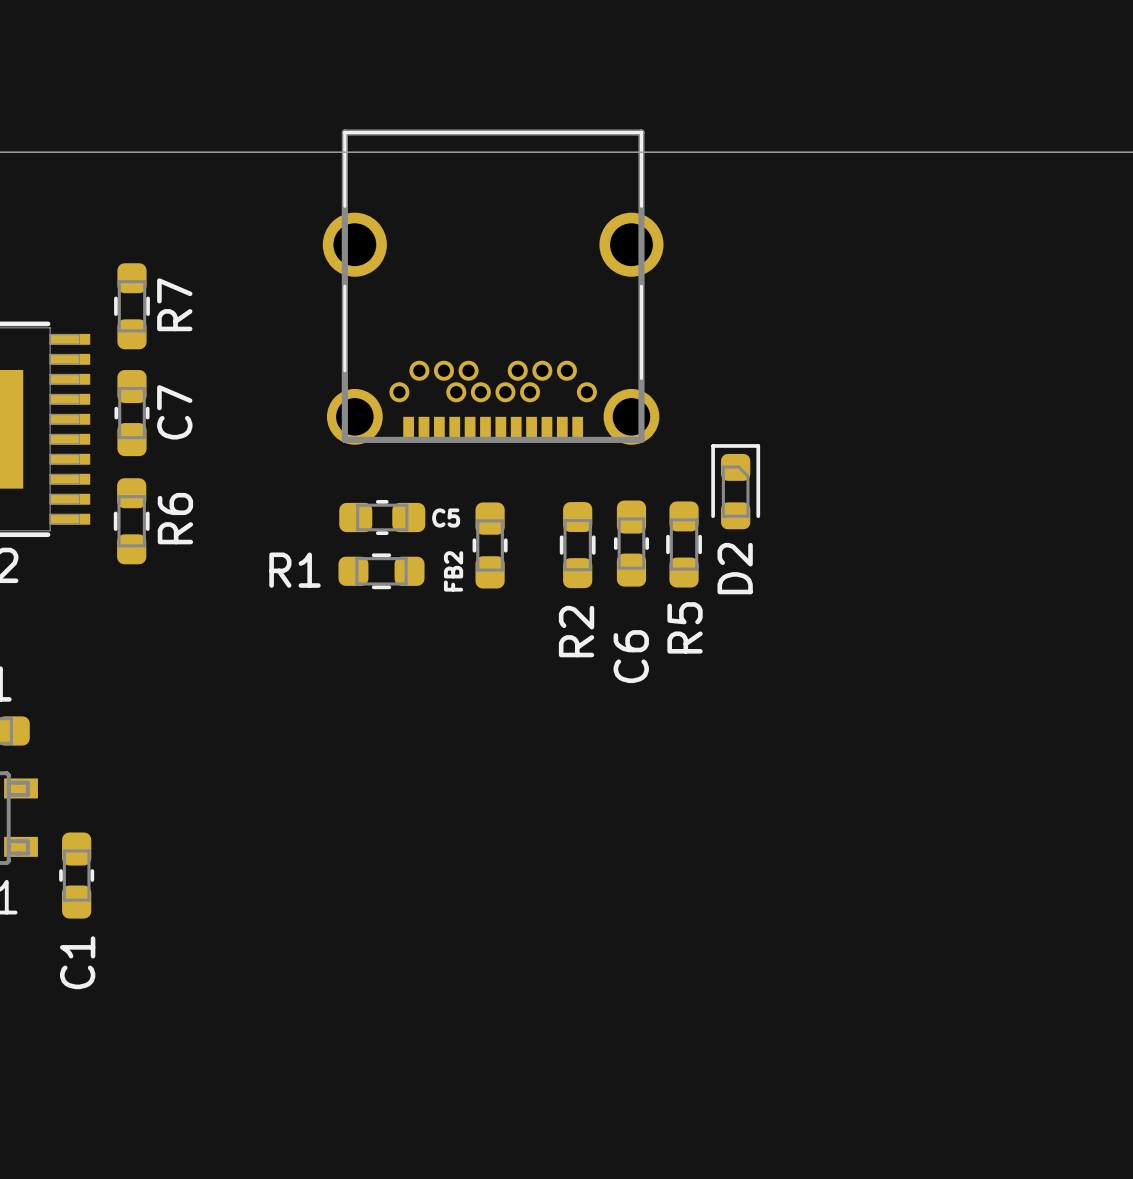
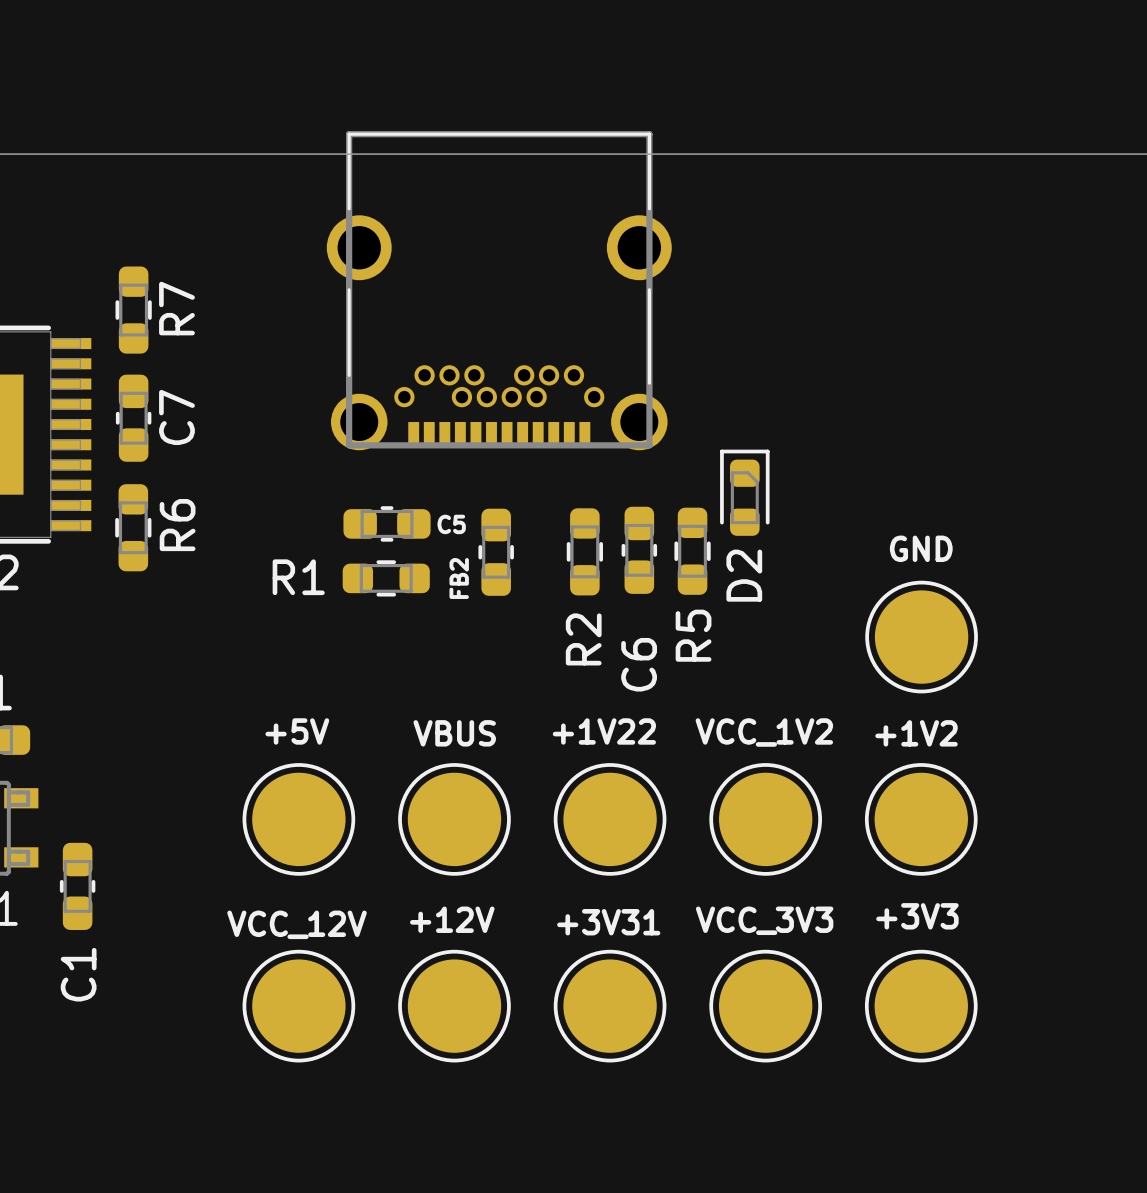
GND: none -> (921, 637)
+5V: none -> (298, 819)
VBUS: none -> (454, 819)
+1V22: none -> (610, 819)
VCC_1V2: none -> (765, 819)
+1V2: none -> (921, 819)
VCC_12V: none -> (298, 1006)
+12V: none -> (454, 1006)
+3V31: none -> (610, 1006)
VCC_3V3: none -> (765, 1006)
+3V3: none -> (921, 1006)

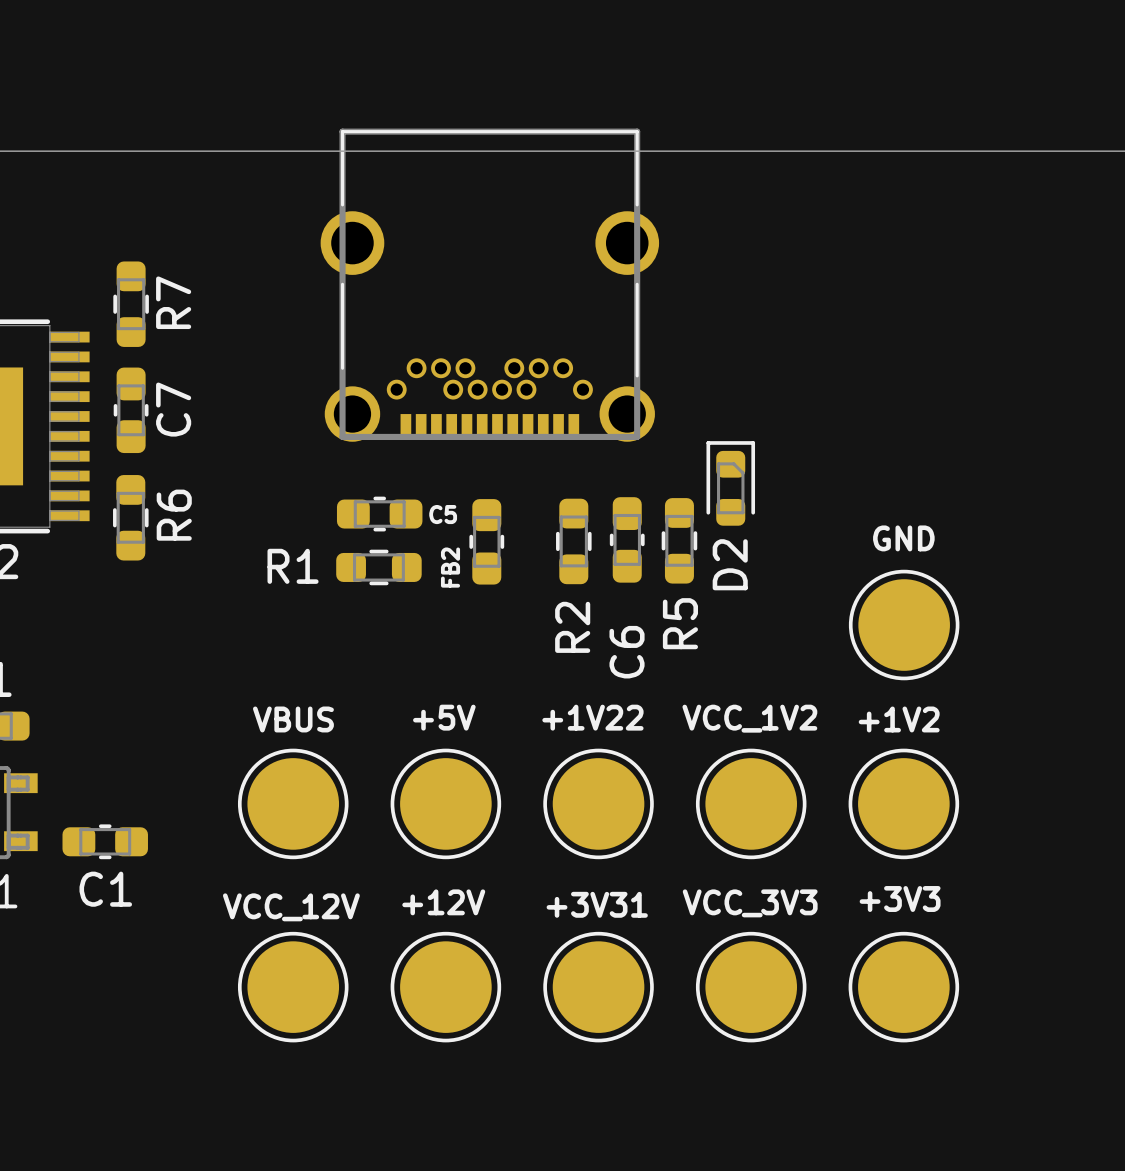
+5V name: +5V (297, 731) -> VBUS (293, 719)
VBUS name: VBUS (454, 733) -> +5V (444, 717)
C1 rotation: 0° (77, 886) -> 90° clockwise (105, 841)

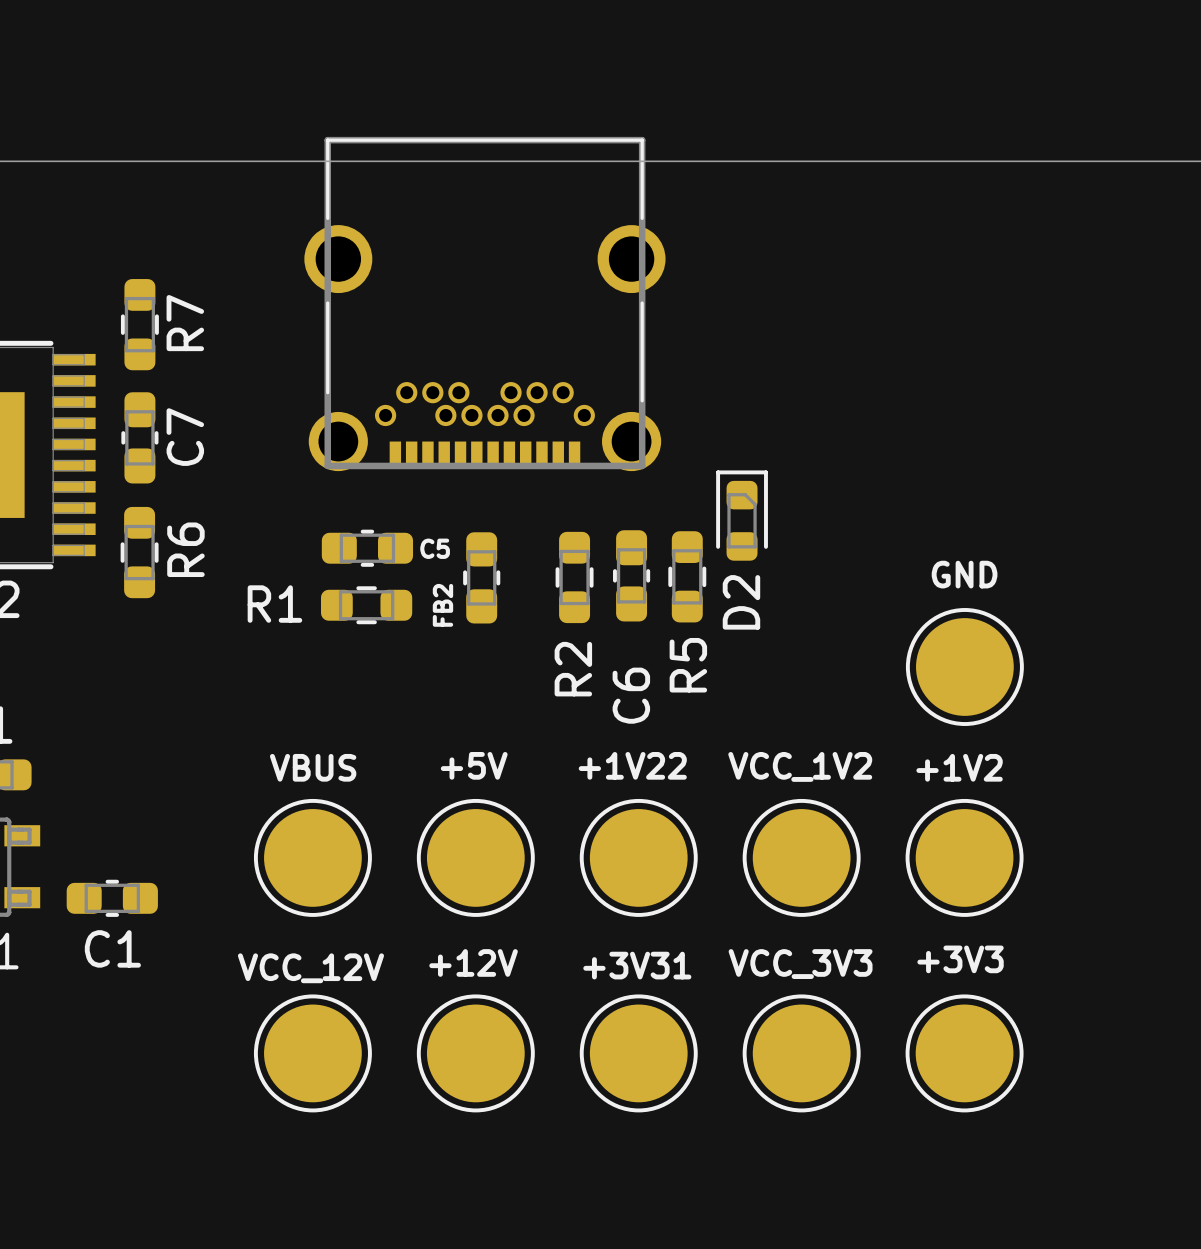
part position: (489, 285) -> (484, 303)
D2 position: (730, 483) -> (742, 515)
C5 position: (379, 514) -> (367, 548)
C6 position: (627, 539) -> (631, 575)
R5 position: (679, 540) -> (687, 576)
FB2 position: (486, 541) -> (481, 577)
R2 position: (573, 541) -> (574, 577)
R1 position: (378, 567) -> (366, 605)

